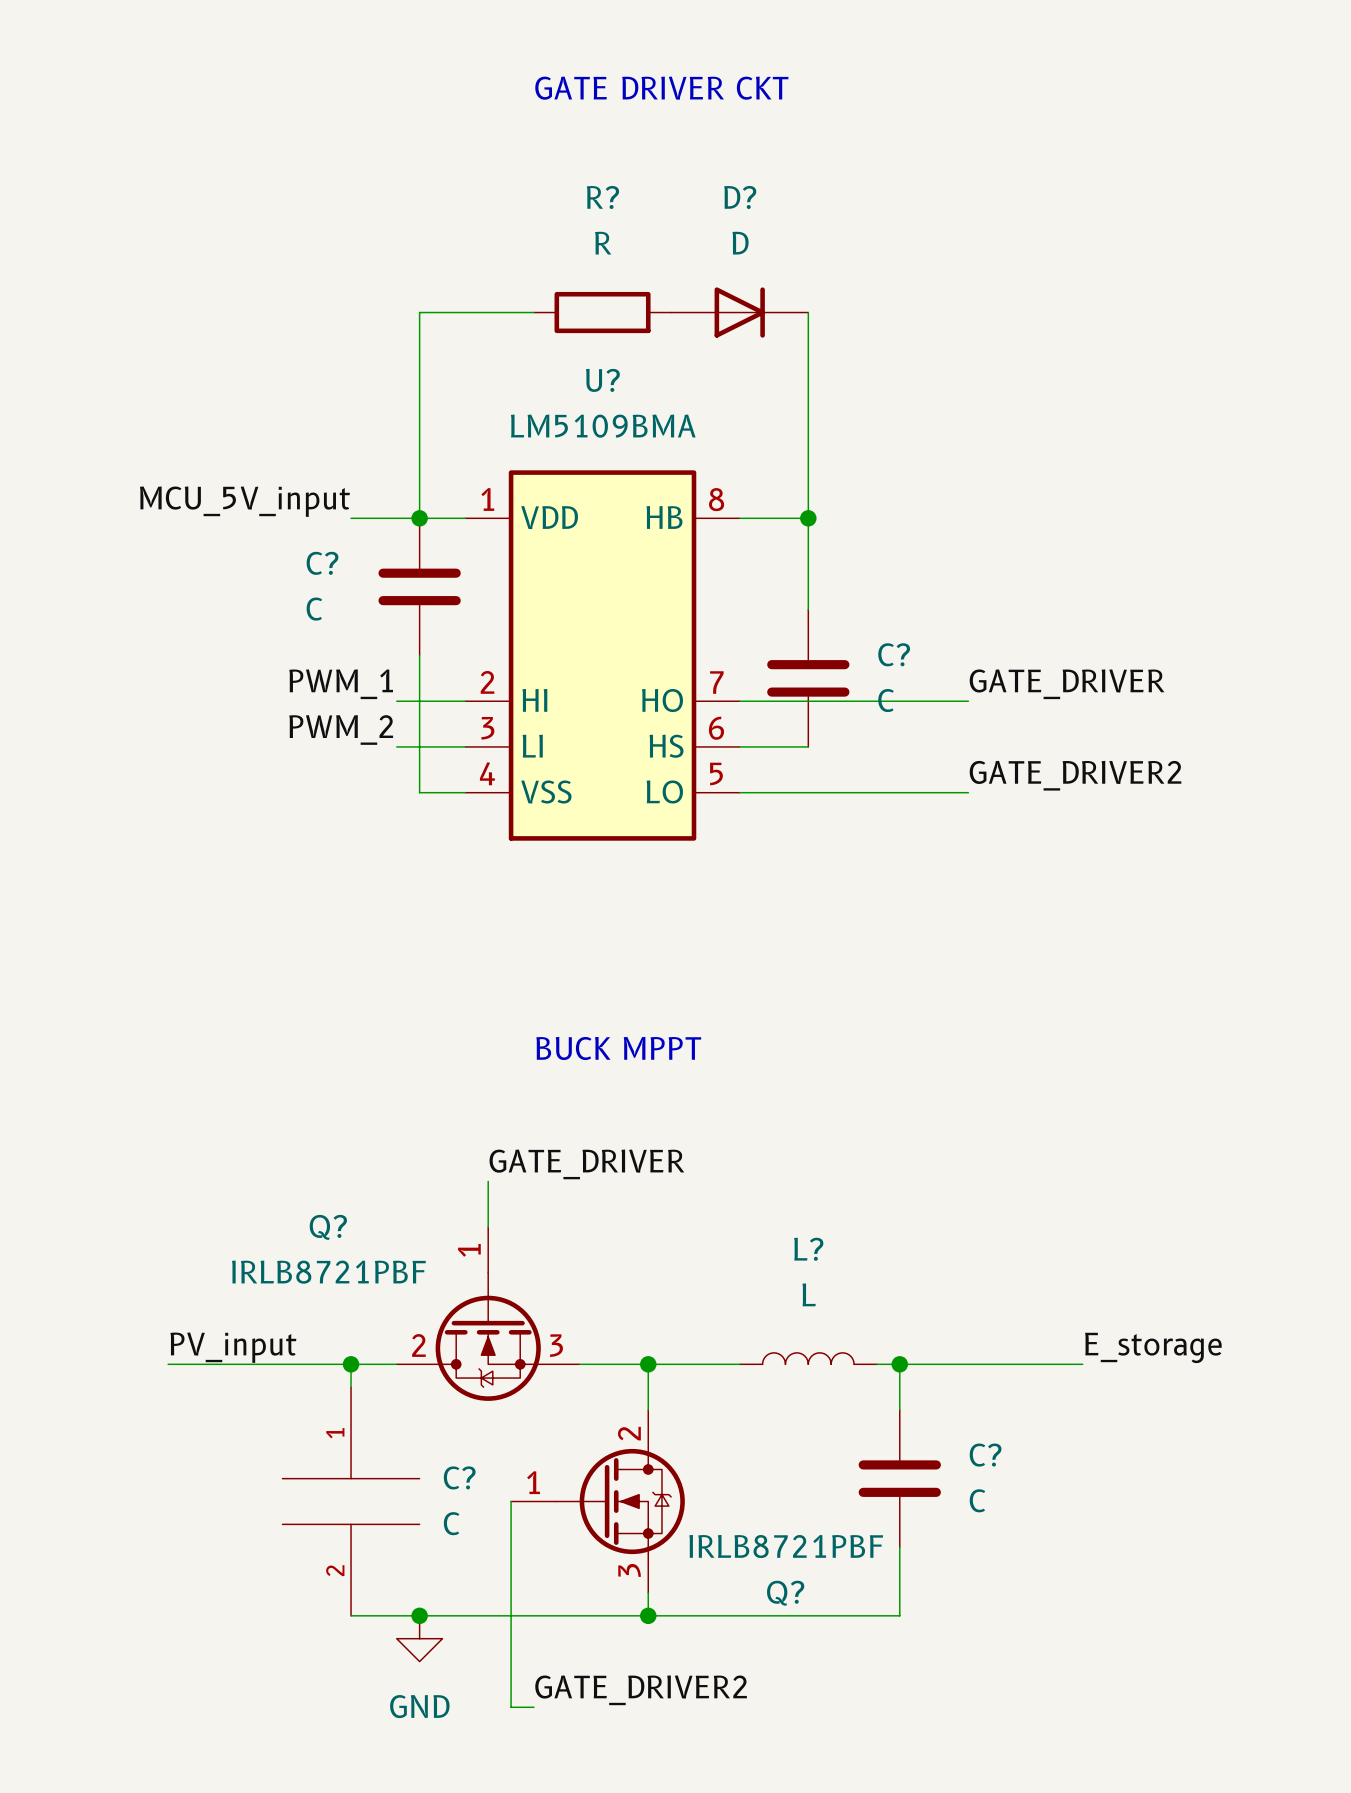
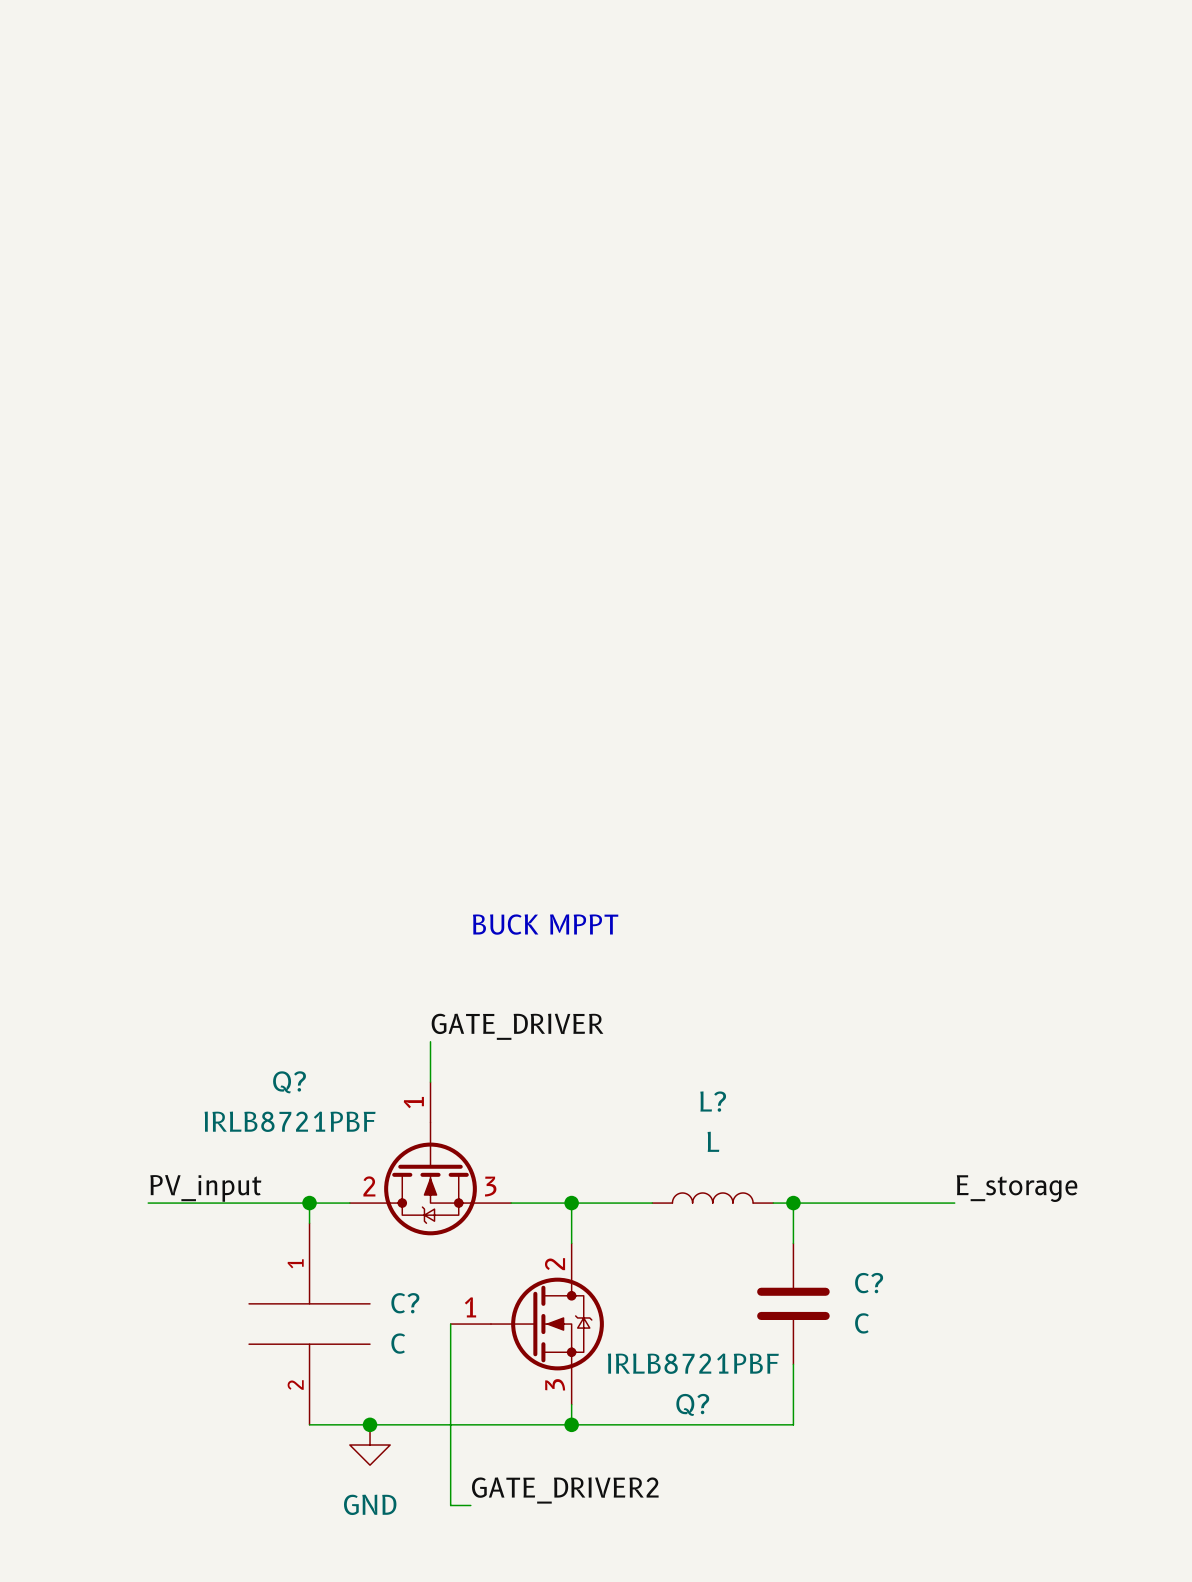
text: GATE DRIVER CKT (661, 88) -> none
wire: (533, 312) (419, 312) (419, 518) -> none
R?: R (602, 312) -> none
D?: D (739, 312) -> none
wire: (808, 312) (808, 609) -> none
label: MCU_5V_input (244, 501) -> none
wire: (351, 518) (465, 518) -> none
junction: (419, 518) -> none
wire: (739, 518) (808, 518) -> none
junction: (808, 518) -> none
C?: C (419, 586) -> none
wire: (419, 655) (419, 792) (465, 792) -> none
U?: LM5109BMA (602, 655) -> none
C?: C (808, 678) -> none
label: PWM_1 (341, 684) -> none
label: GATE_DRIVER (1067, 684) -> none
wire: (396, 701) (465, 701) -> none
wire: (739, 701) (968, 701) -> none
label: PWM_2 (341, 729) -> none
wire: (396, 746) (465, 746) -> none
wire: (739, 746) (808, 746) -> none
label: GATE_DRIVER2 (1075, 775) -> none
wire: (739, 792) (968, 792) -> none

